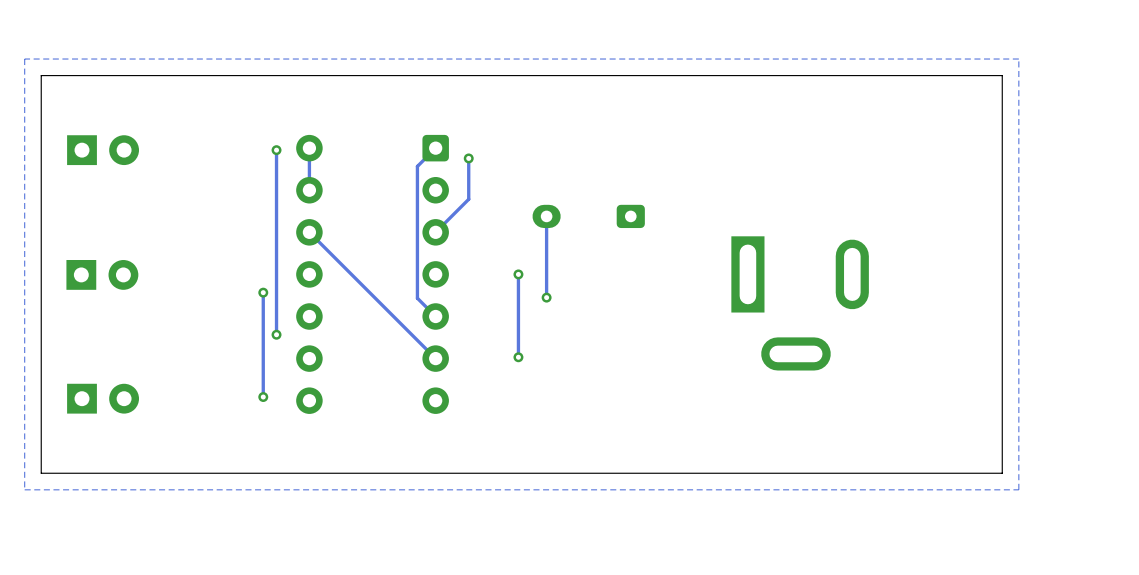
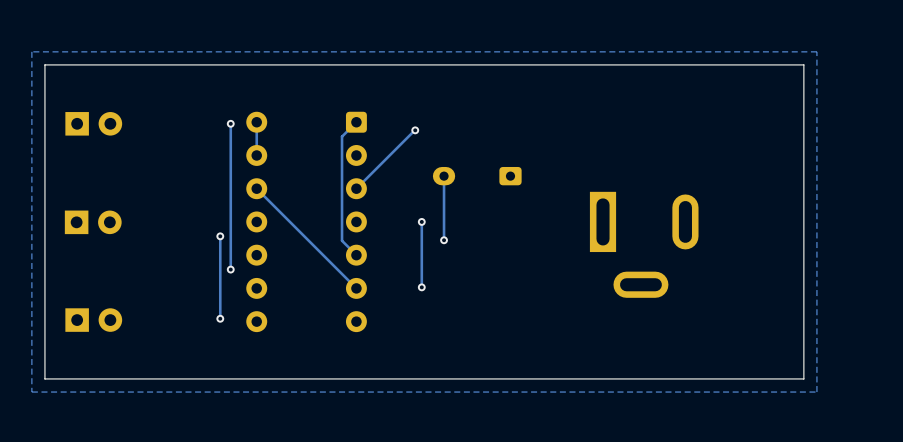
track: (468, 158) (468, 199) -> (415, 130) (382, 162)
via position: (468, 158) -> (415, 130)

